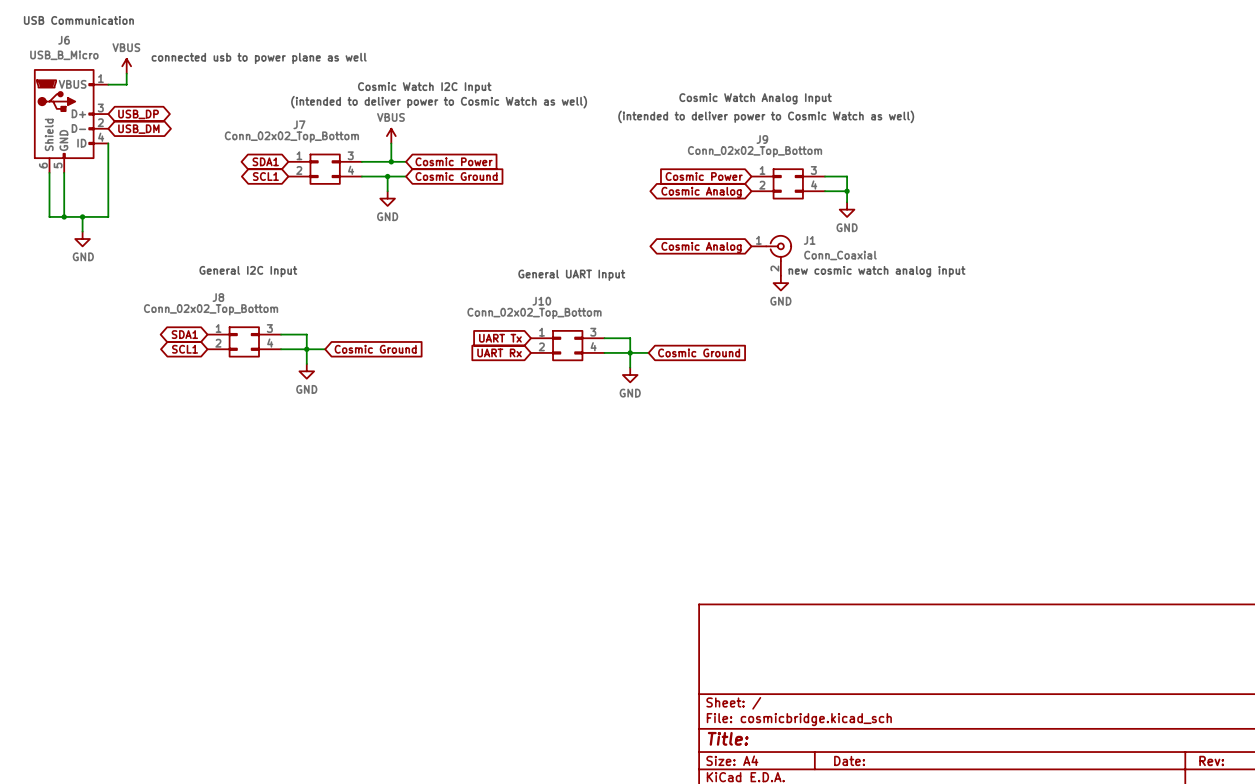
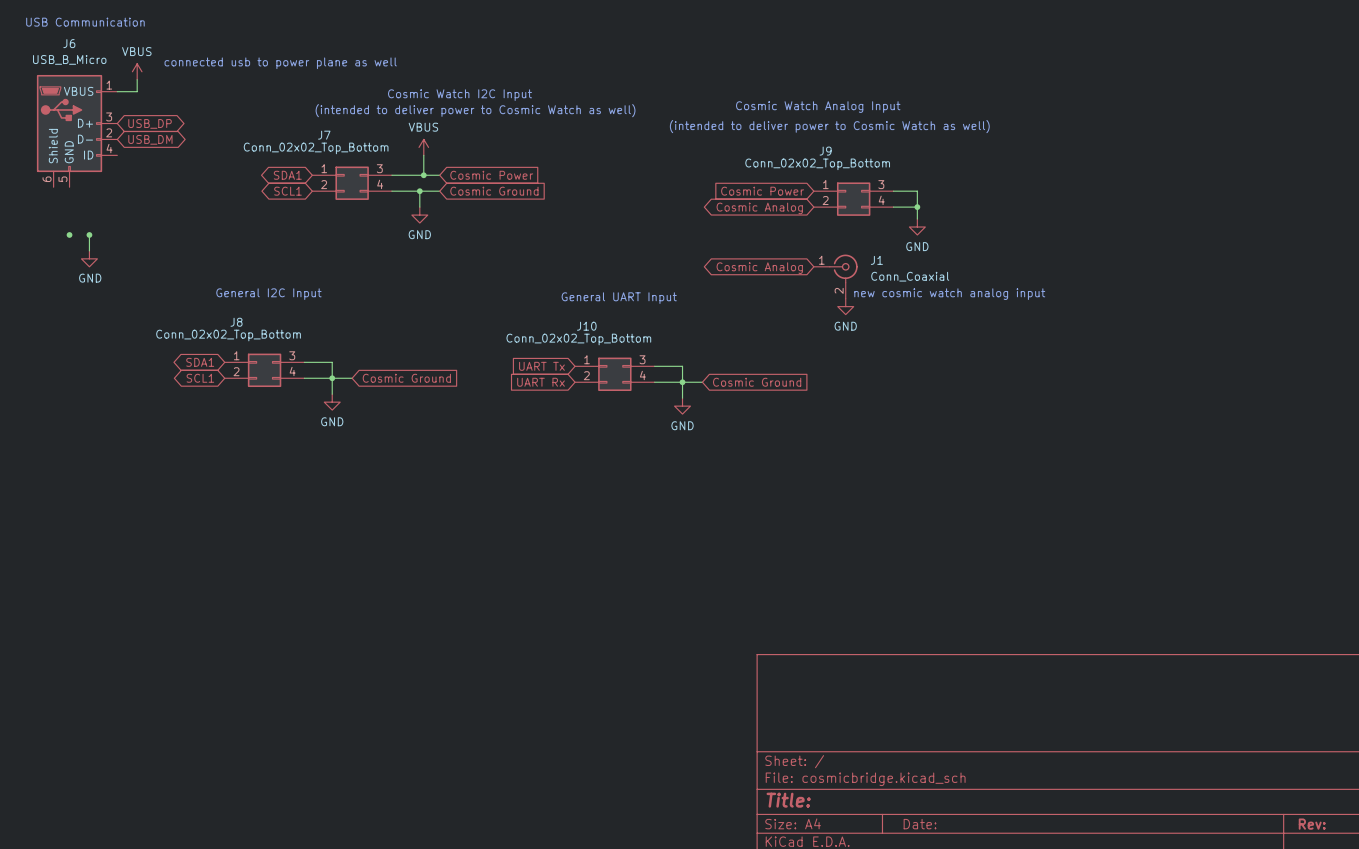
wire: (108, 143) (108, 216) (49, 216) (49, 172) -> none
wire: (64, 172) (64, 216) -> none

